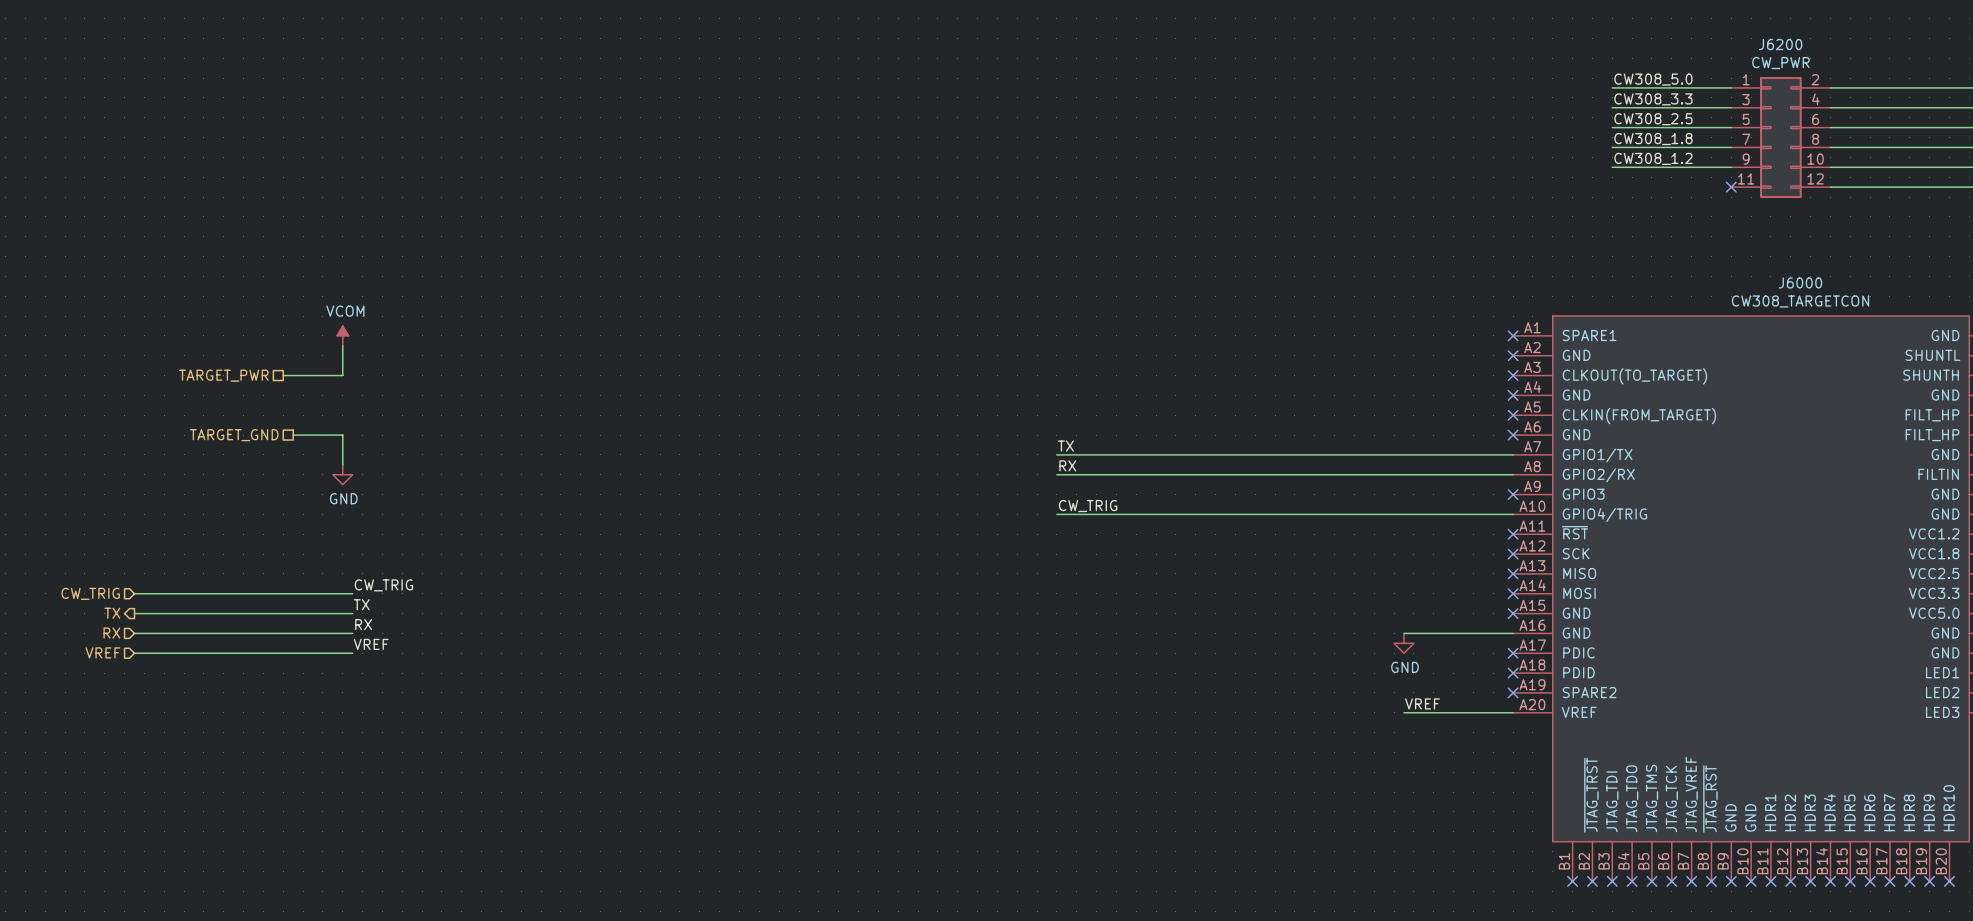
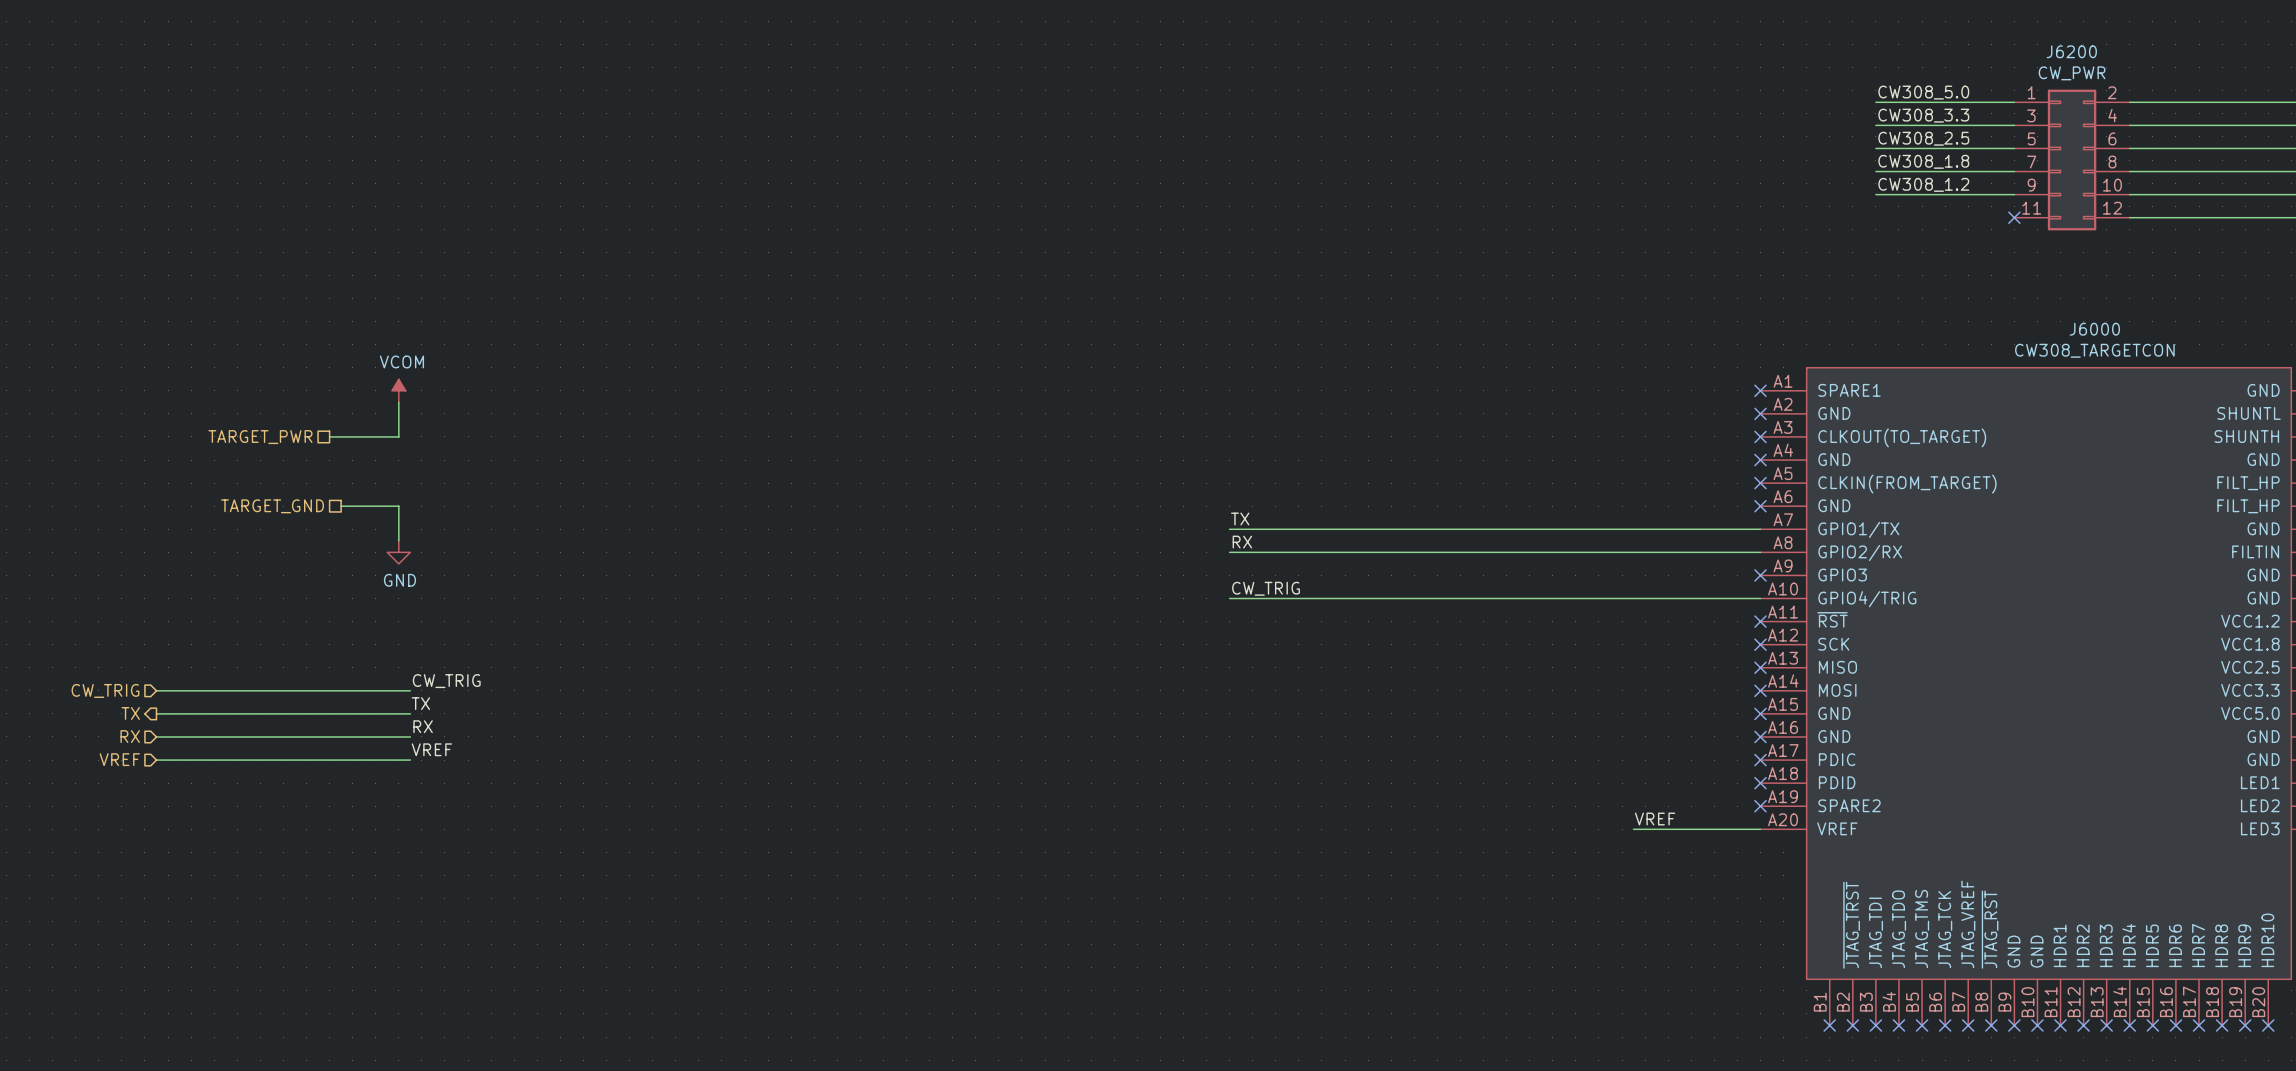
wire: (1404, 633) (1513, 633) -> none
no-connect mark: none -> (1760, 736)
power symbol: GND (1404, 643) -> none

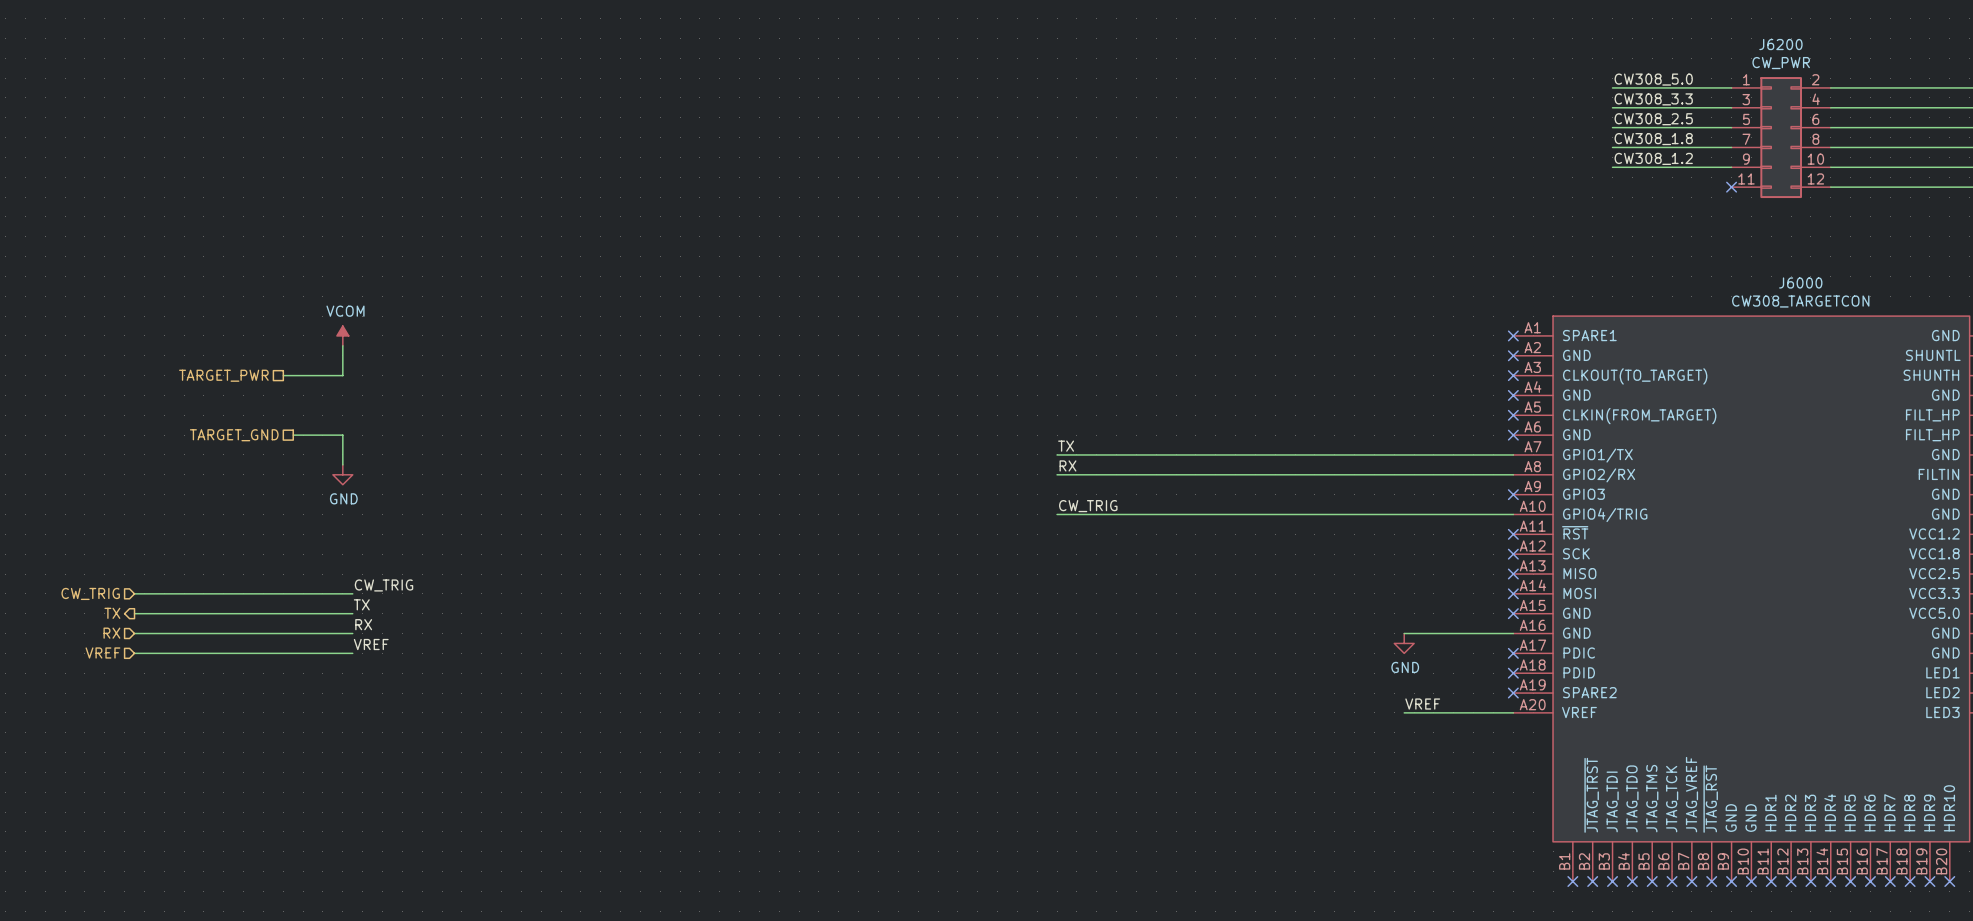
wire: none -> (1404, 633) (1513, 633)
no-connect mark: (1760, 736) -> none
power symbol: none -> GND (1404, 643)

